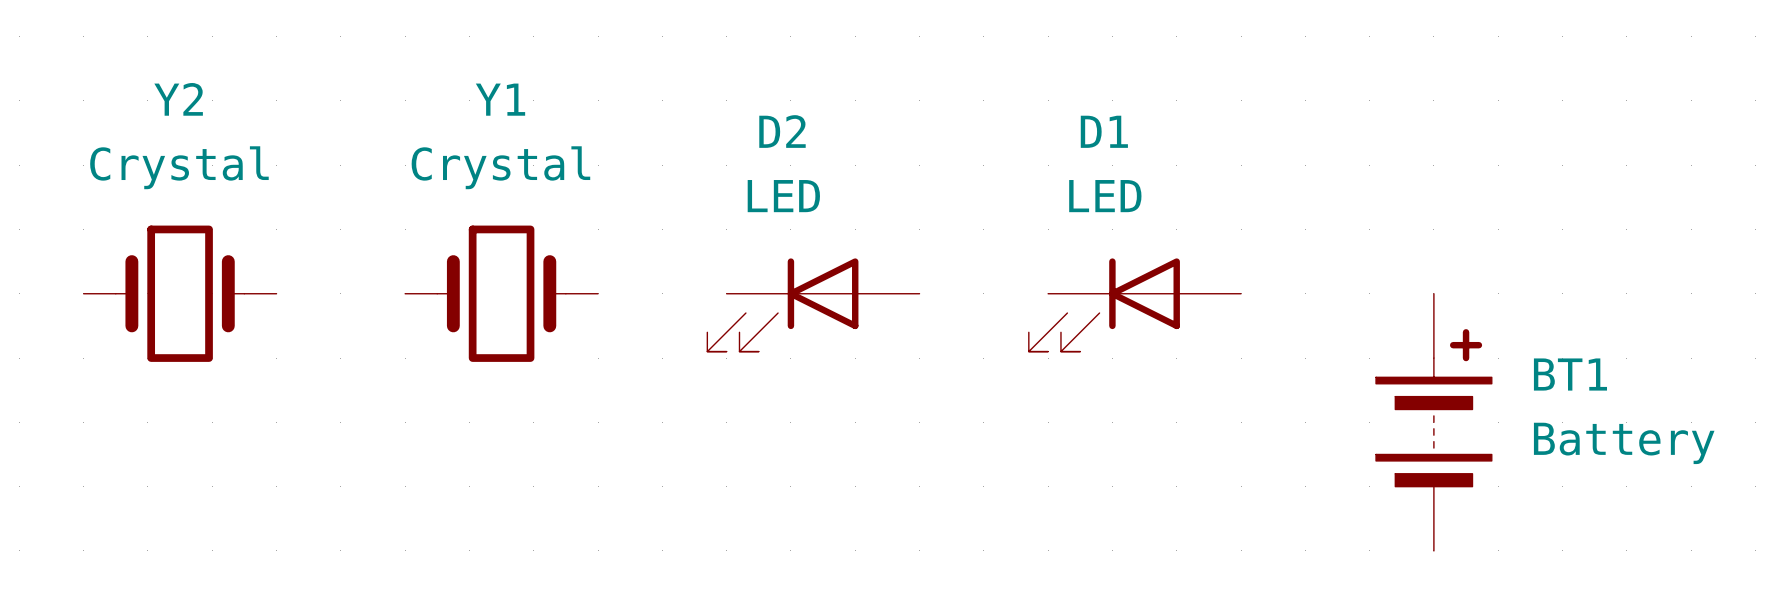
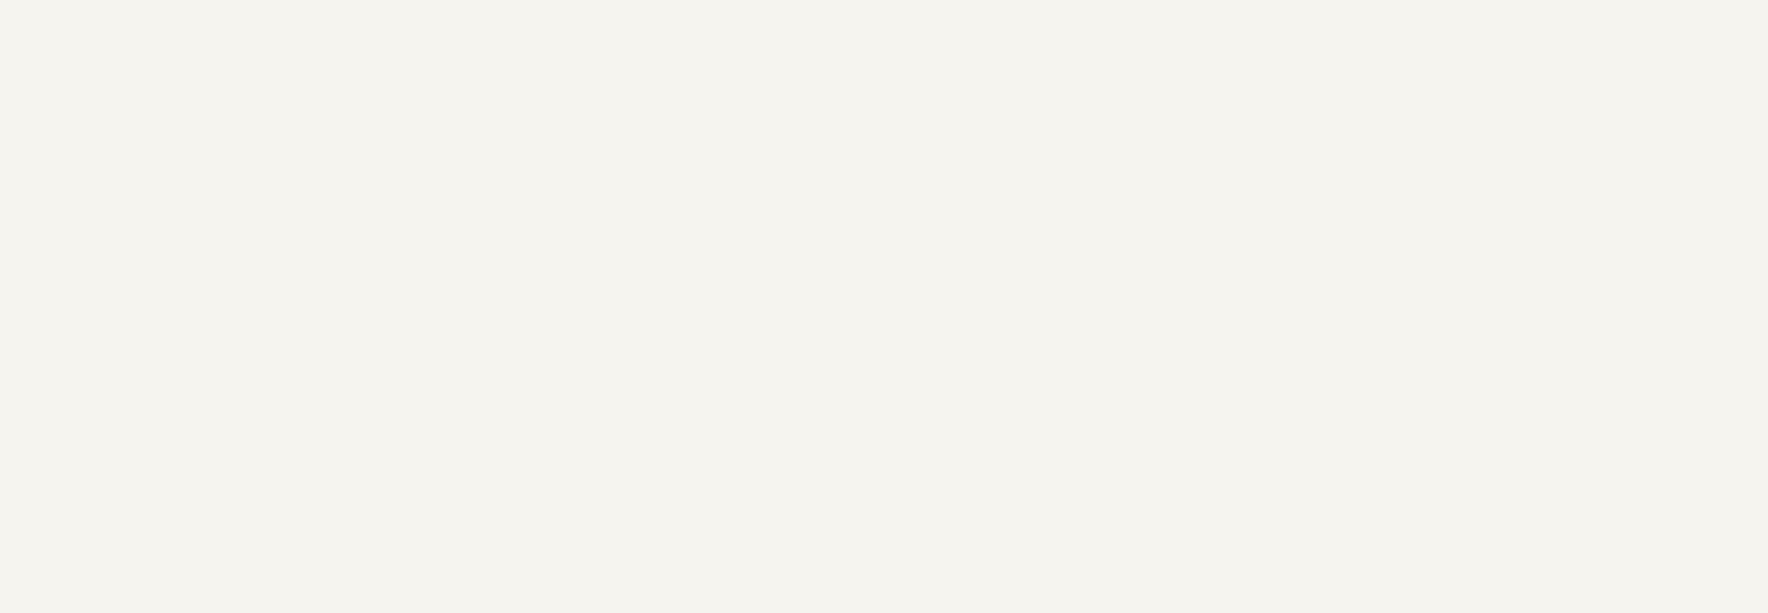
Y2: Crystal (180, 293) -> none
Y1: Crystal (501, 293) -> none
D2: LED (813, 304) -> none
D1: LED (1134, 304) -> none
BT1: Battery (1433, 422) -> none

